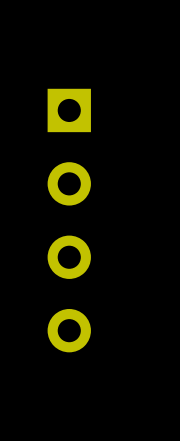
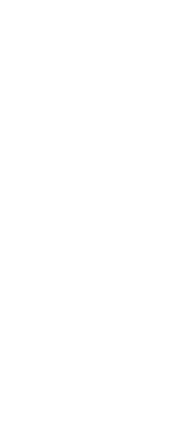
part: (69, 220) -> none

